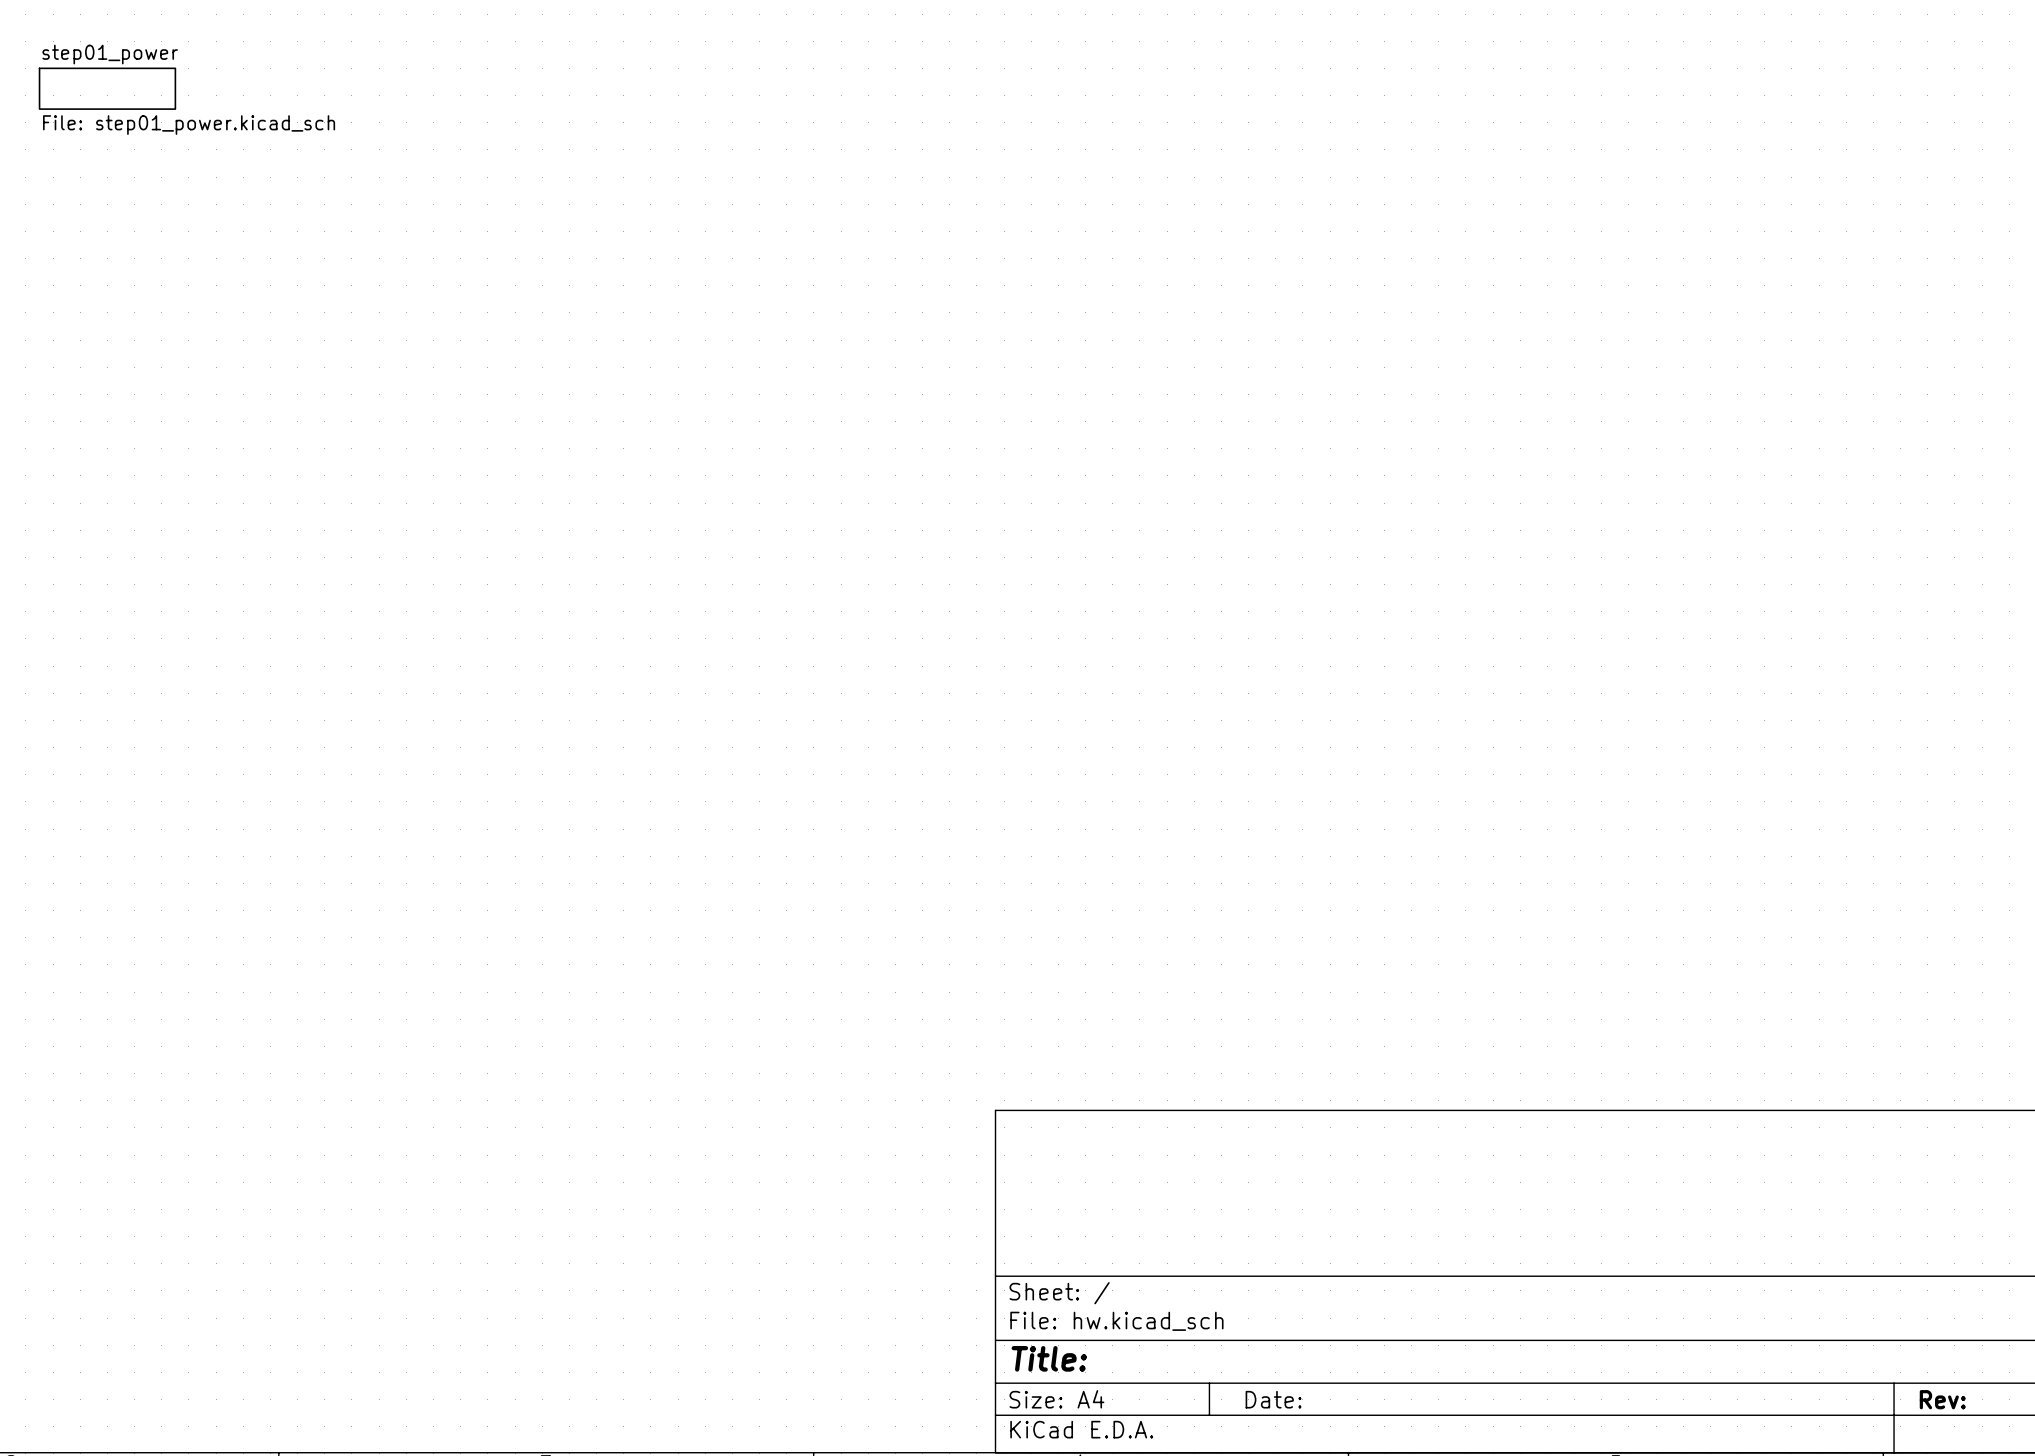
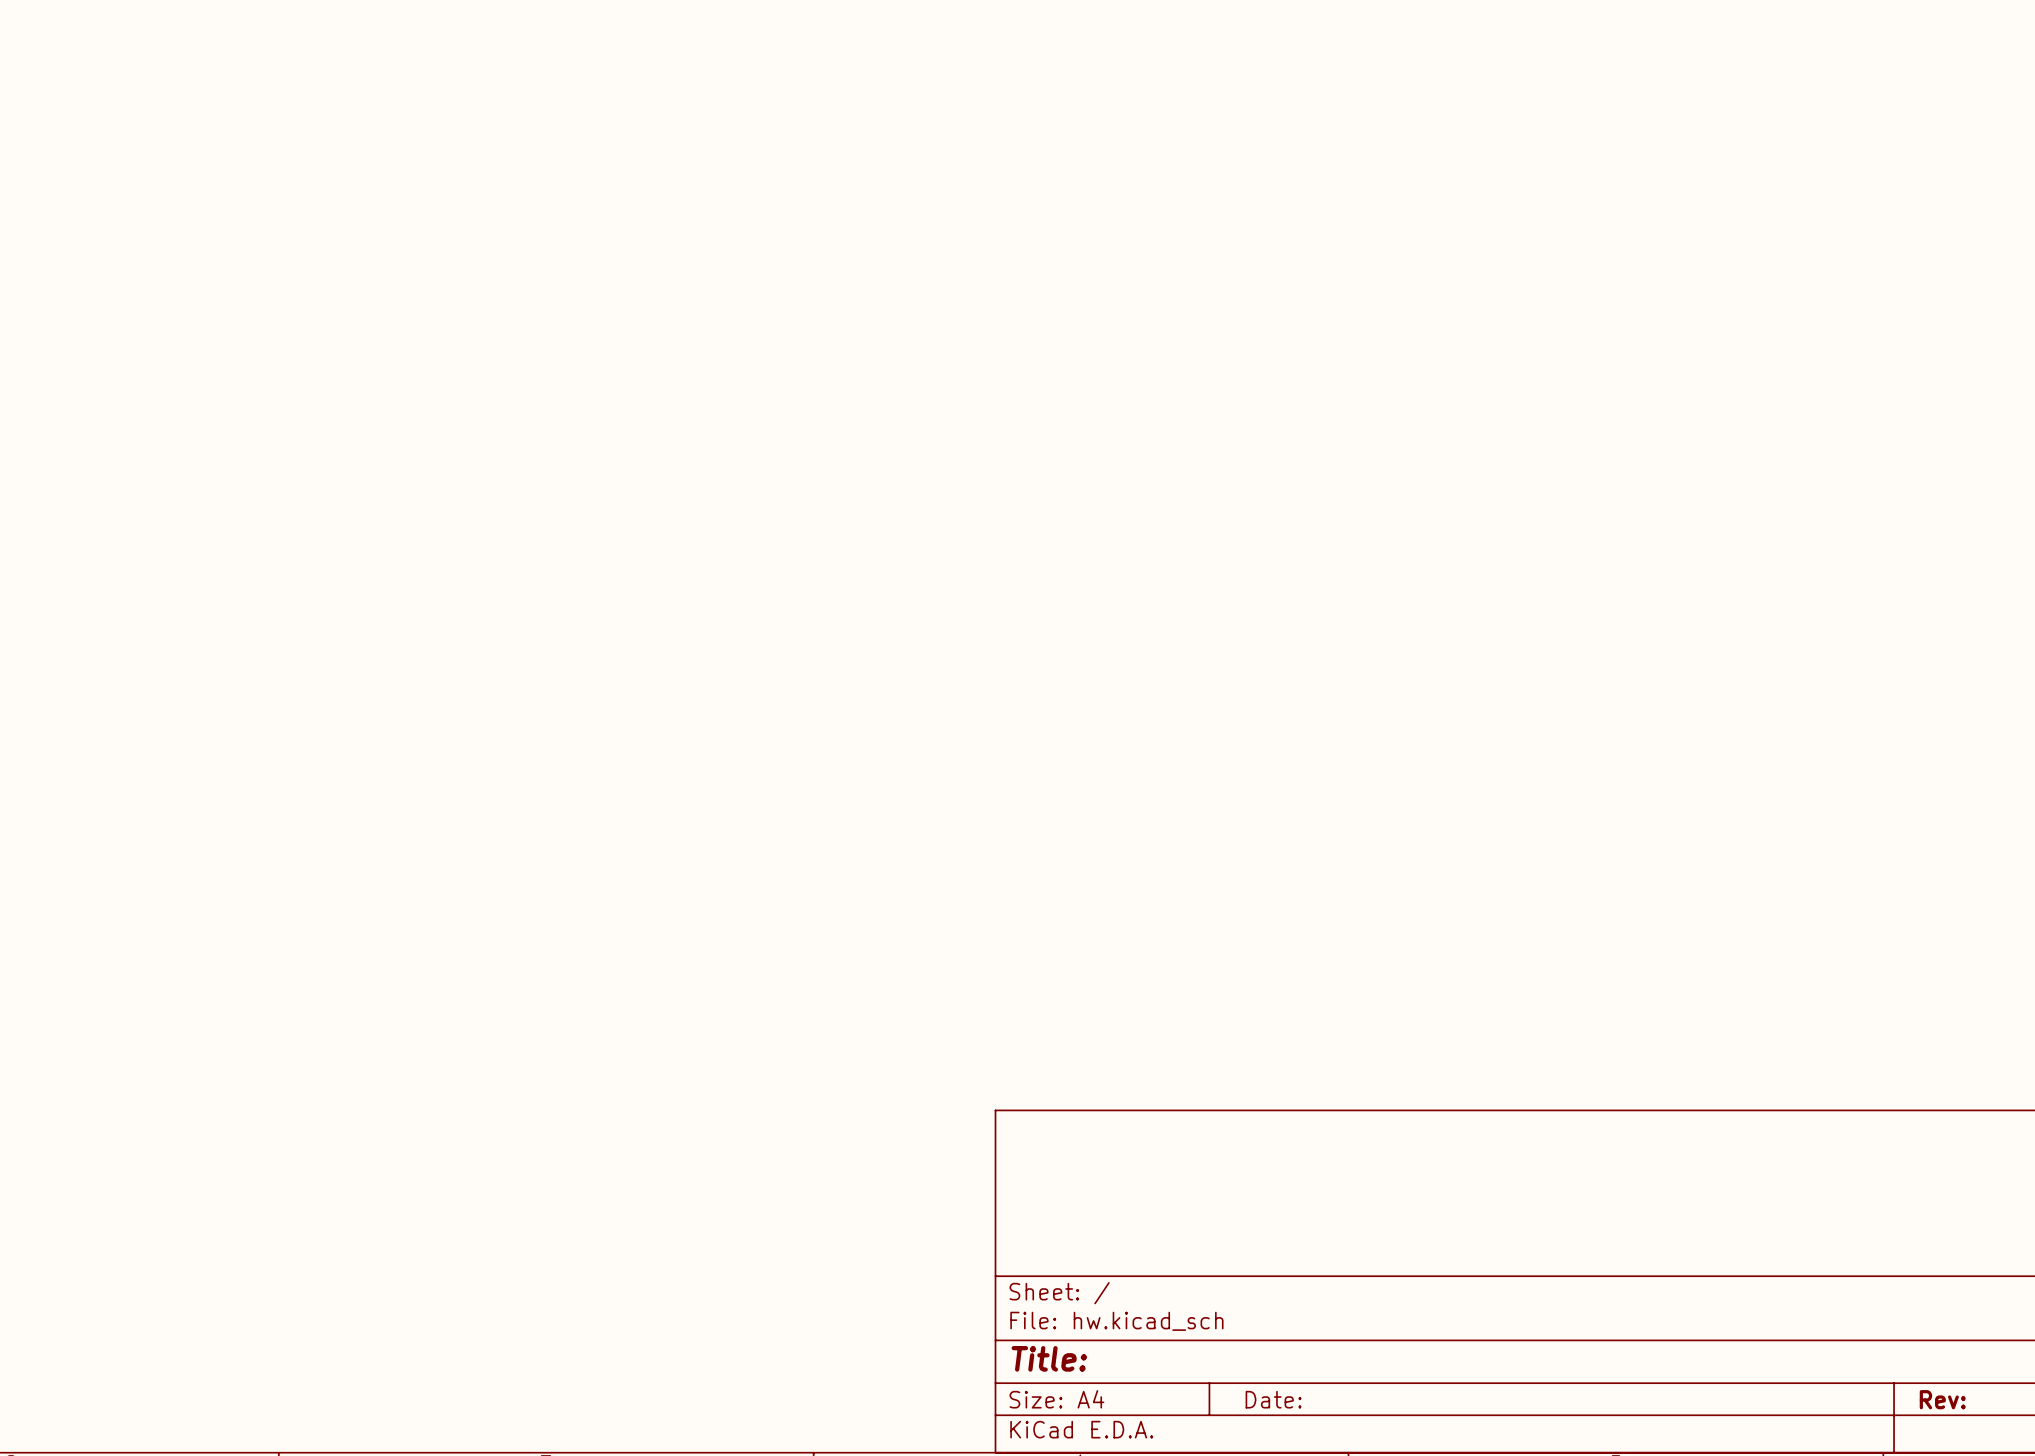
sheet step01_power: File: step01_power.kicad_sch (107, 88) -> none

